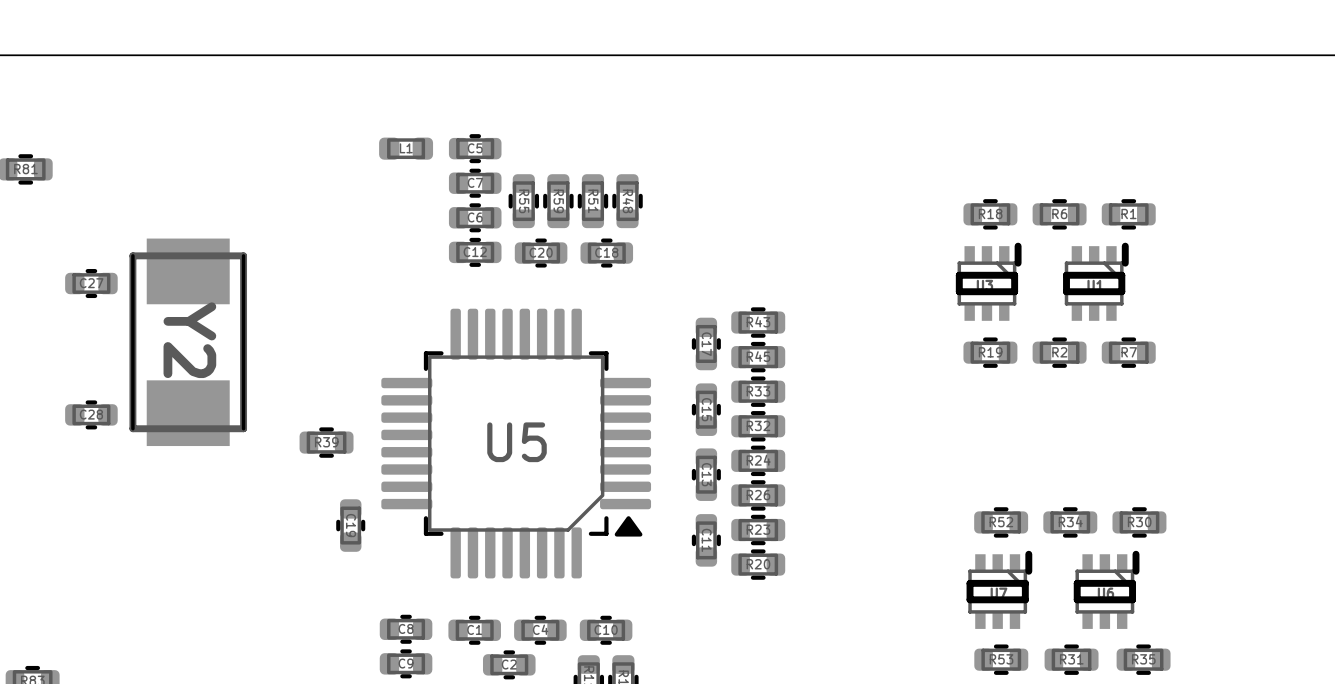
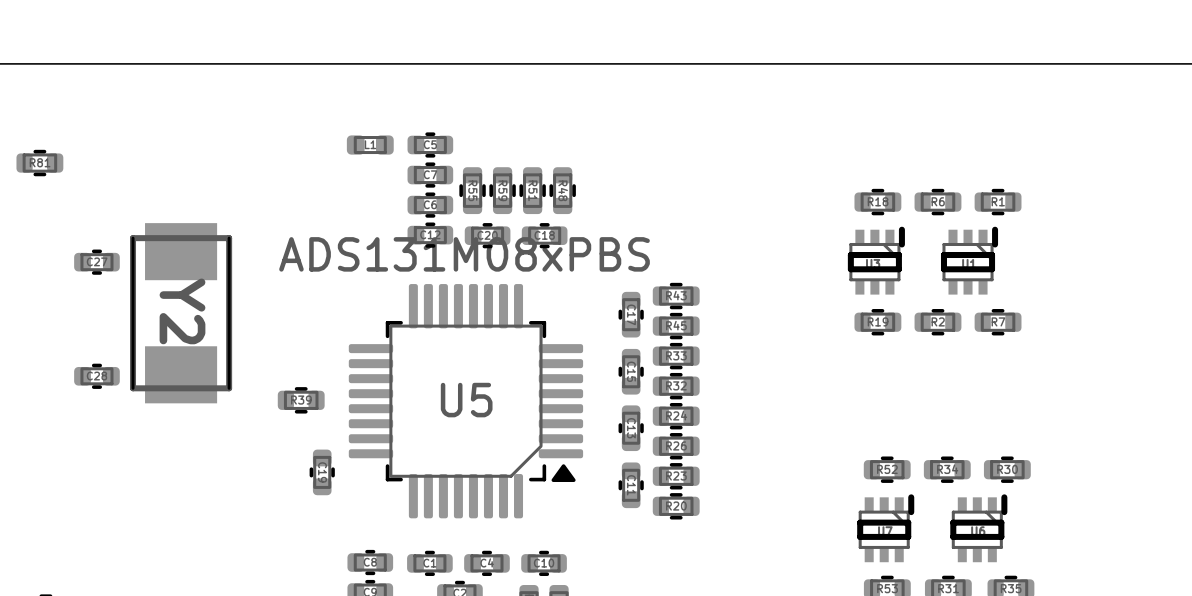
U5 value: none -> ADS131M08xPBS (464, 254)

